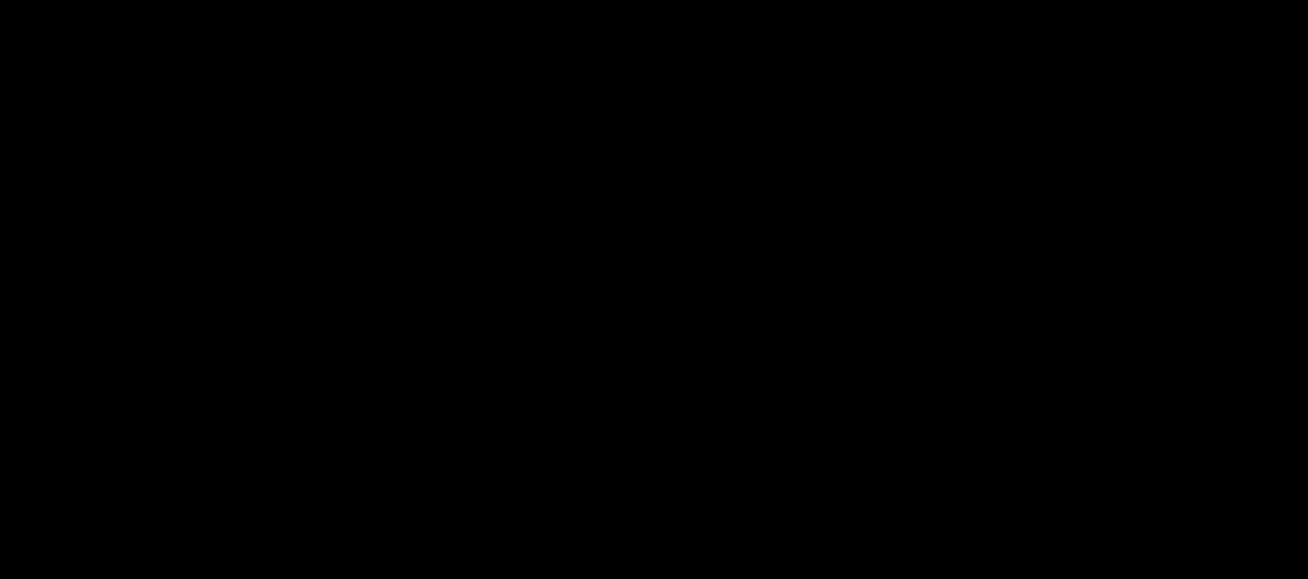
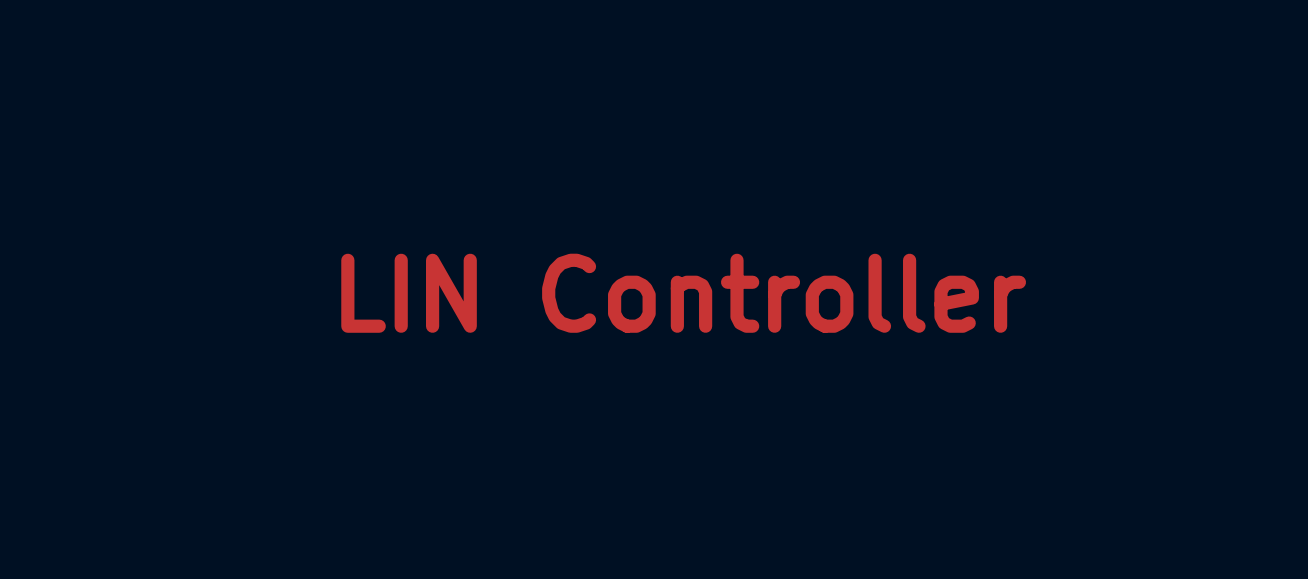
text: none -> LIN Controller (683, 293)

